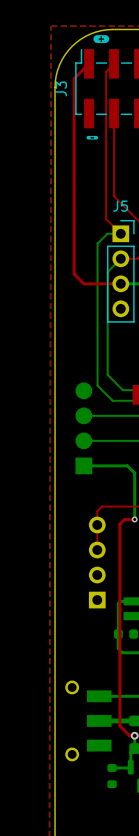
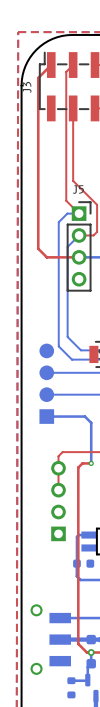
drawing: [93, 35, 110, 43] -> none
drawing: [86, 135, 99, 140] -> none

